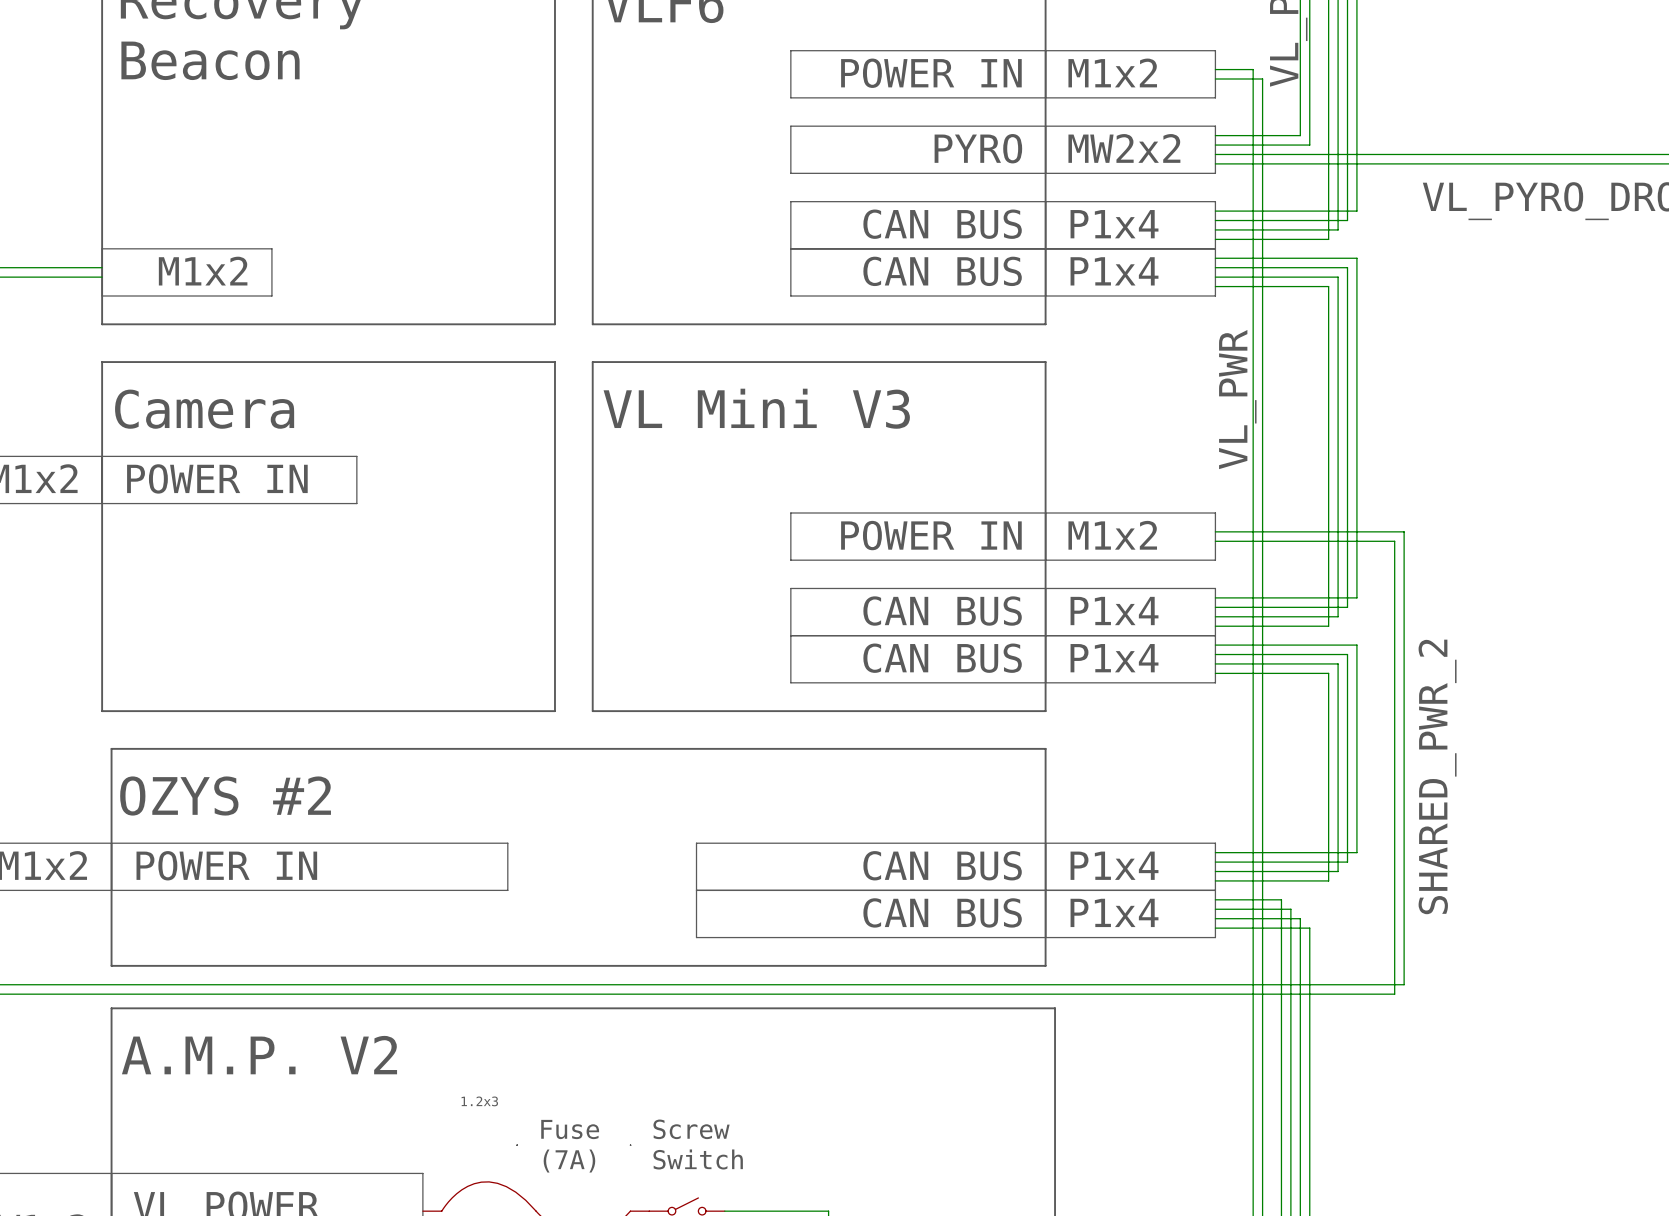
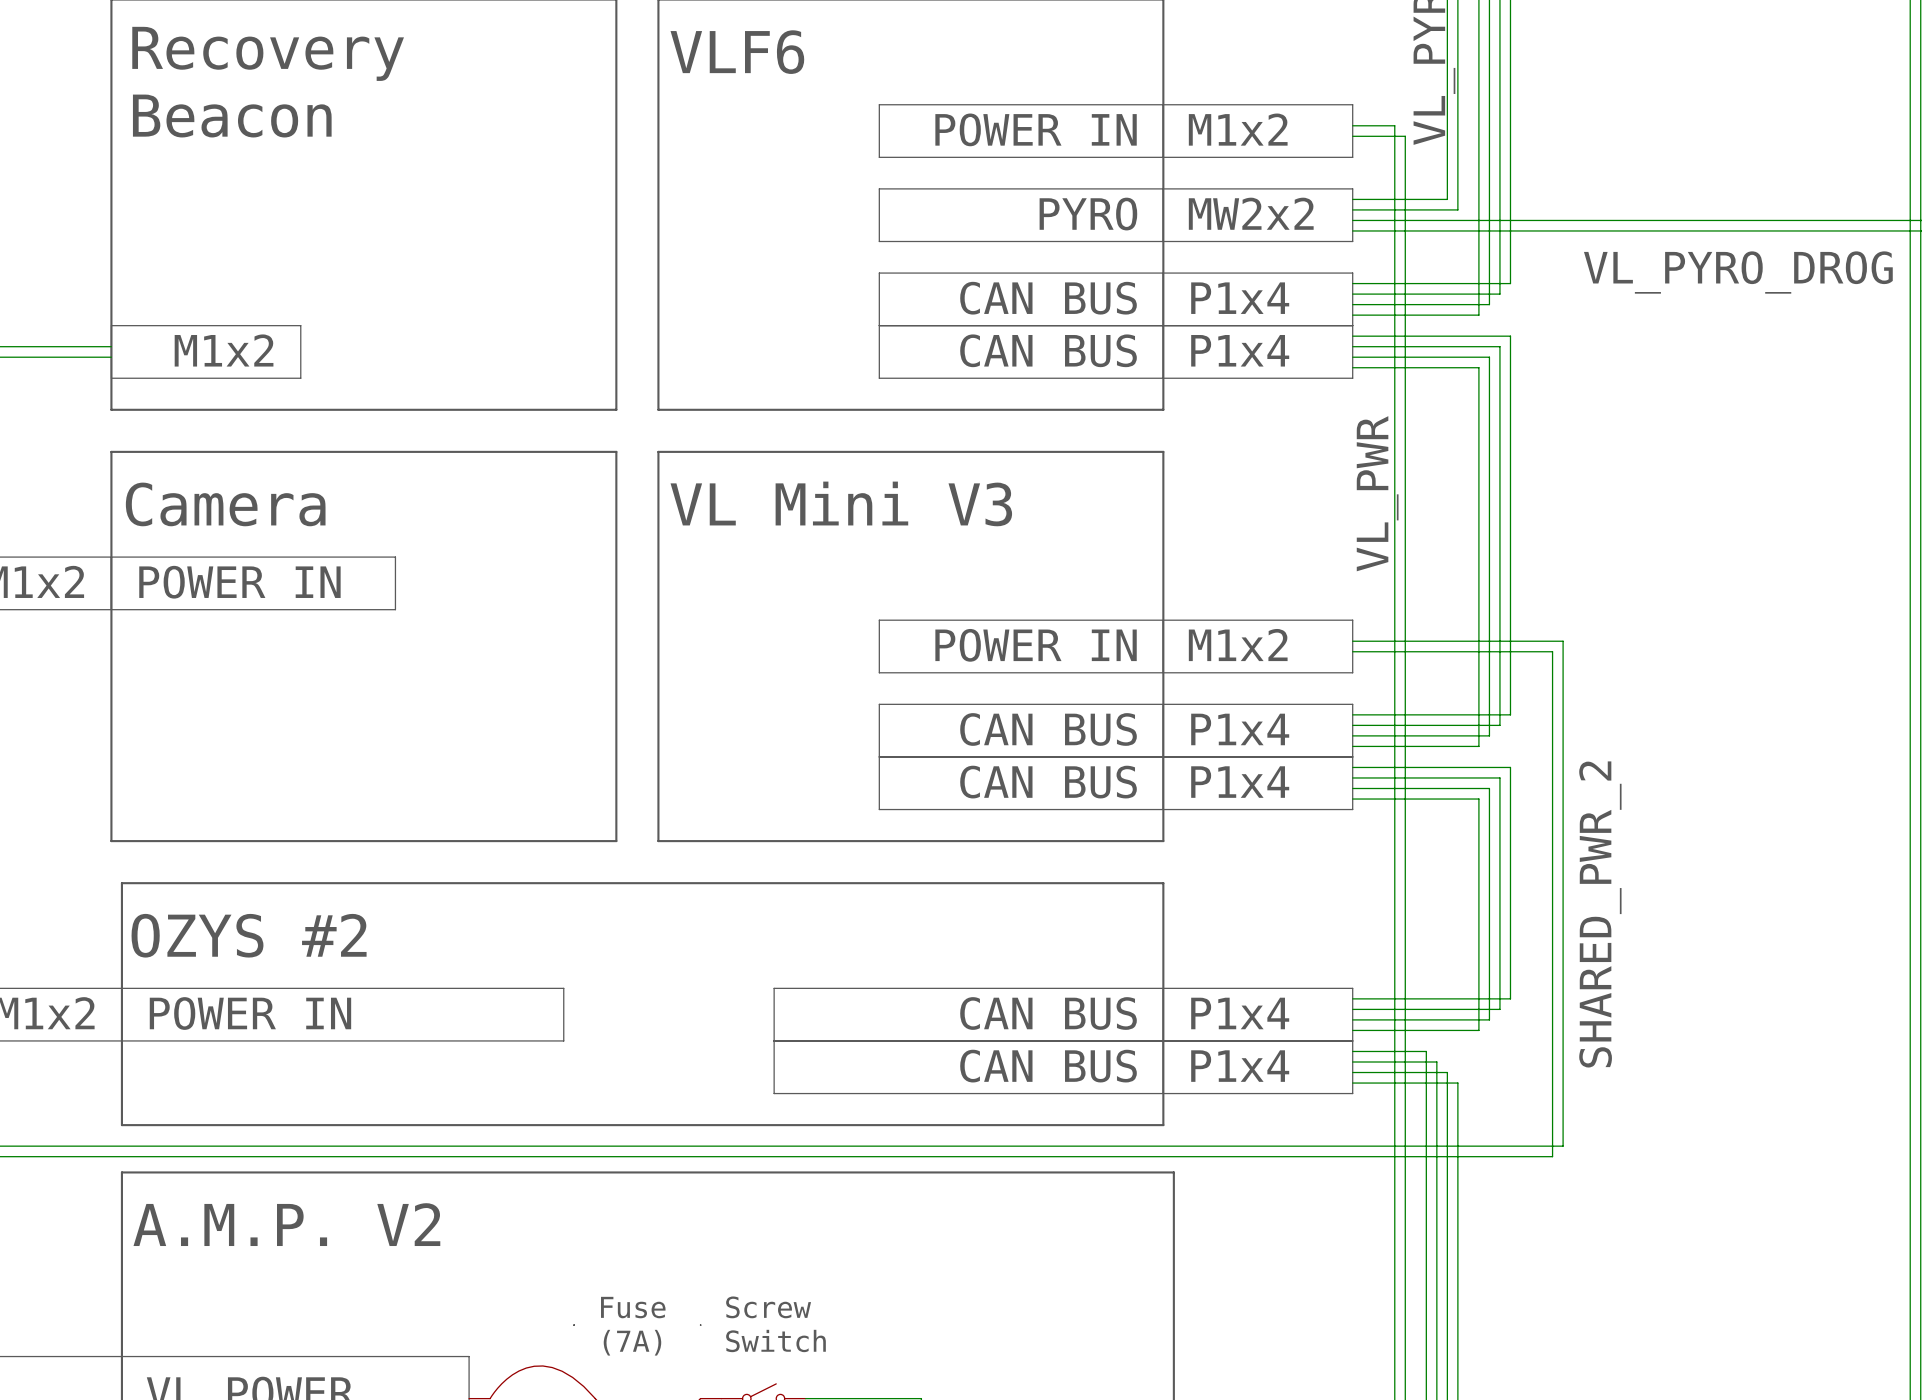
text: 1.2x3 (479, 1101) -> none

